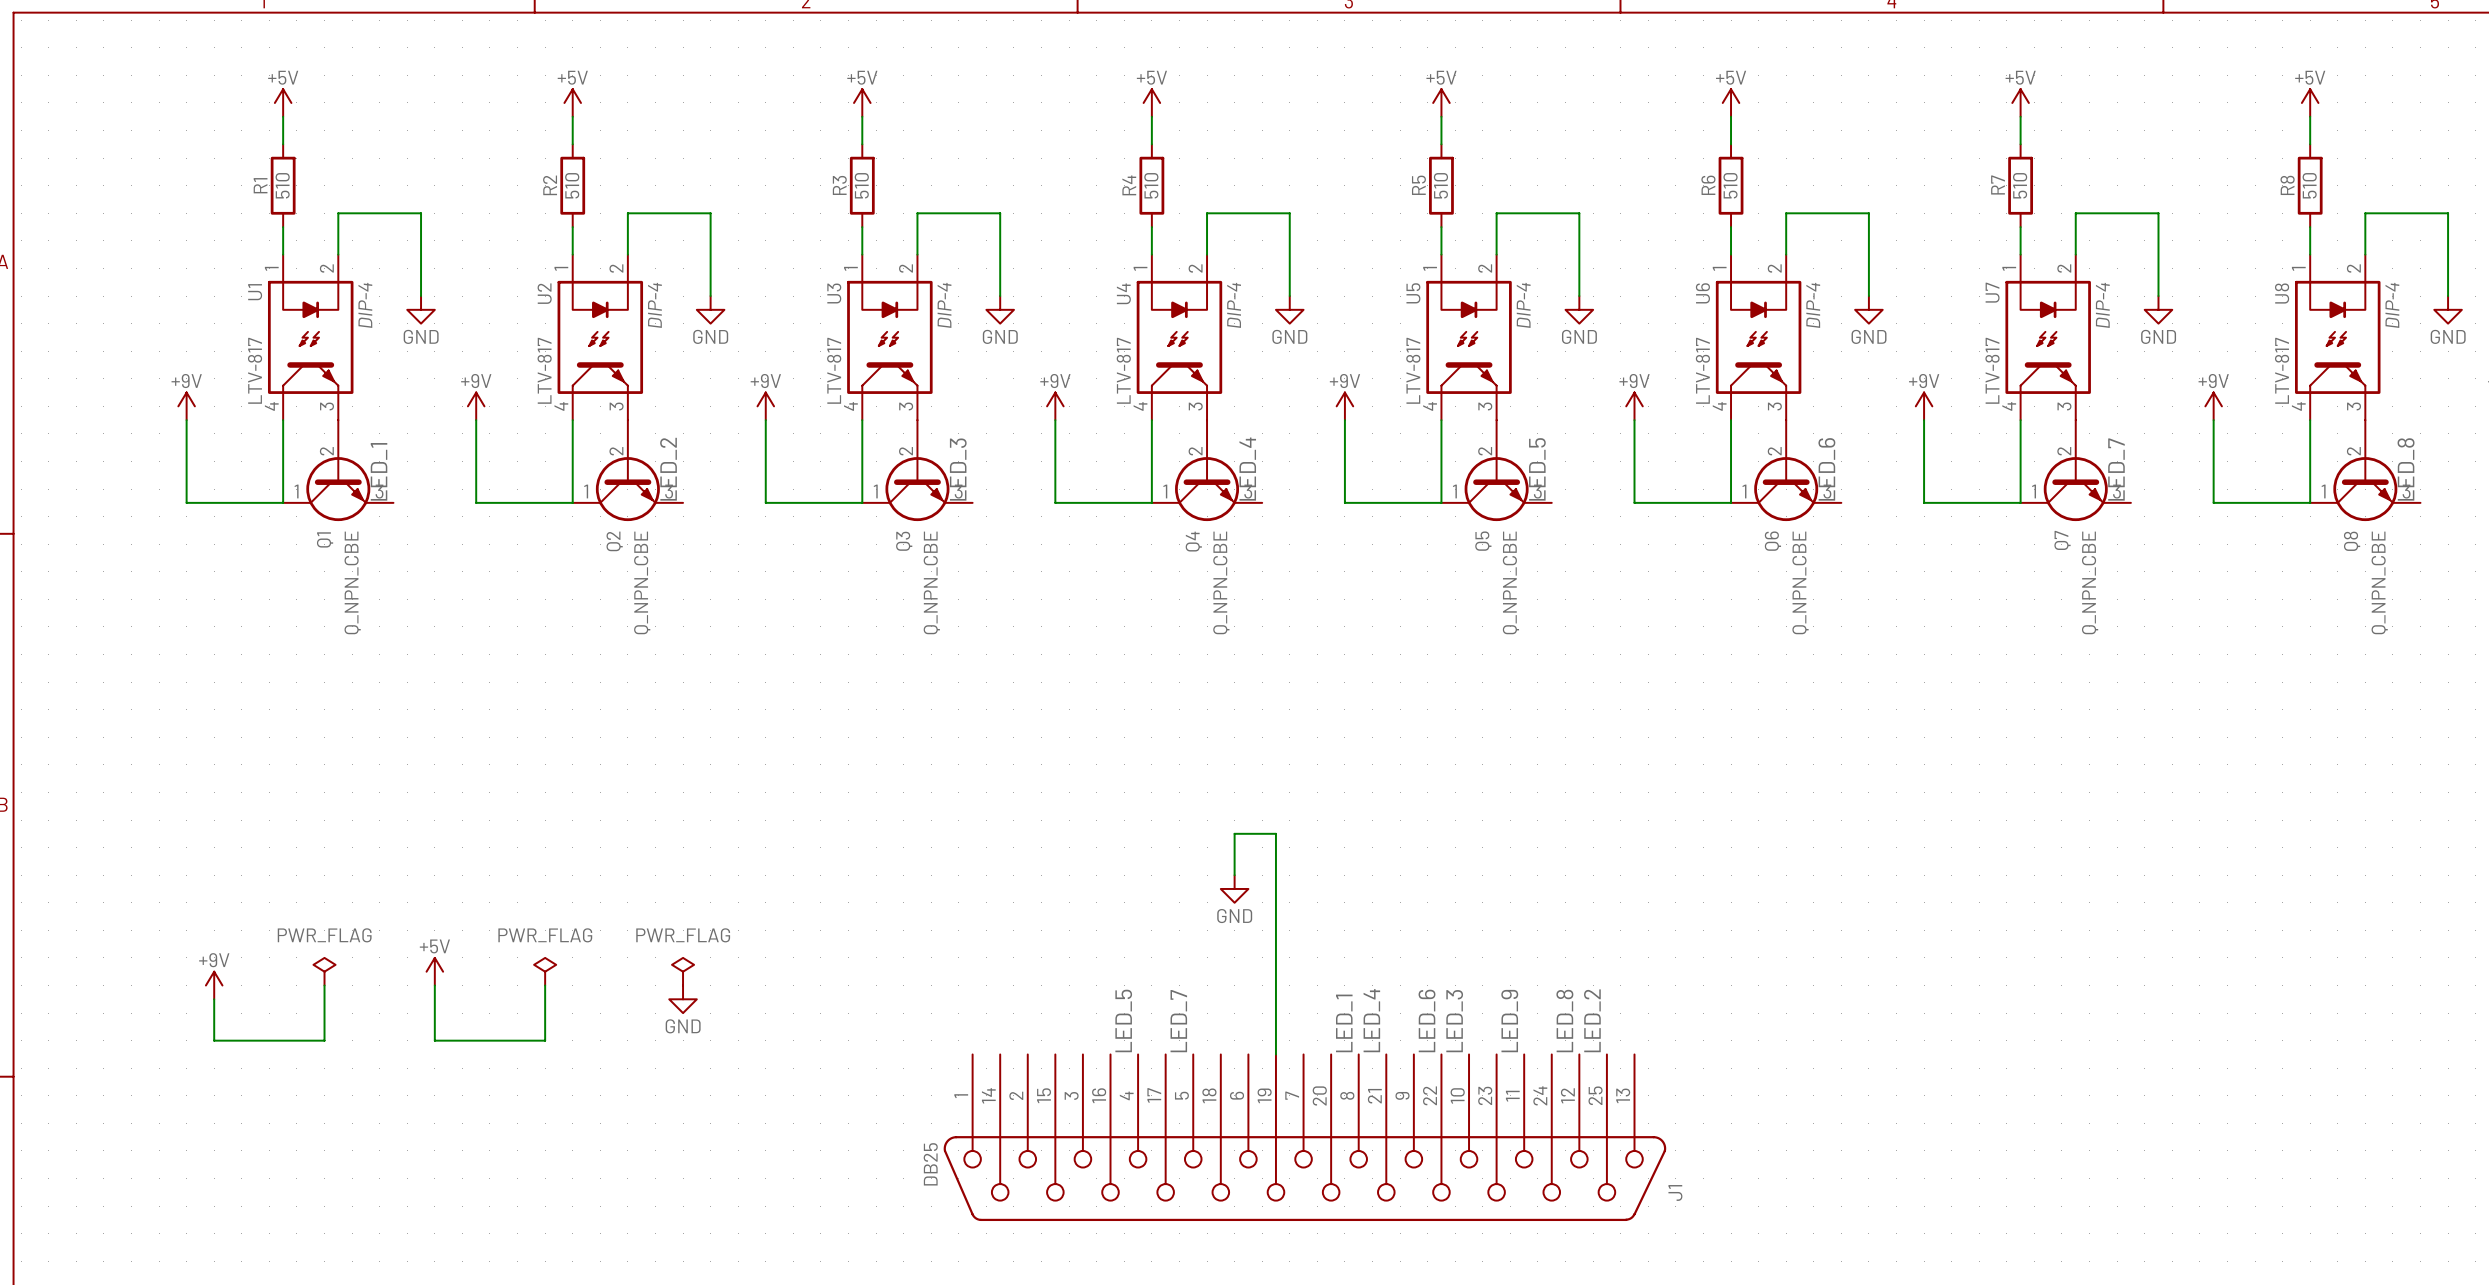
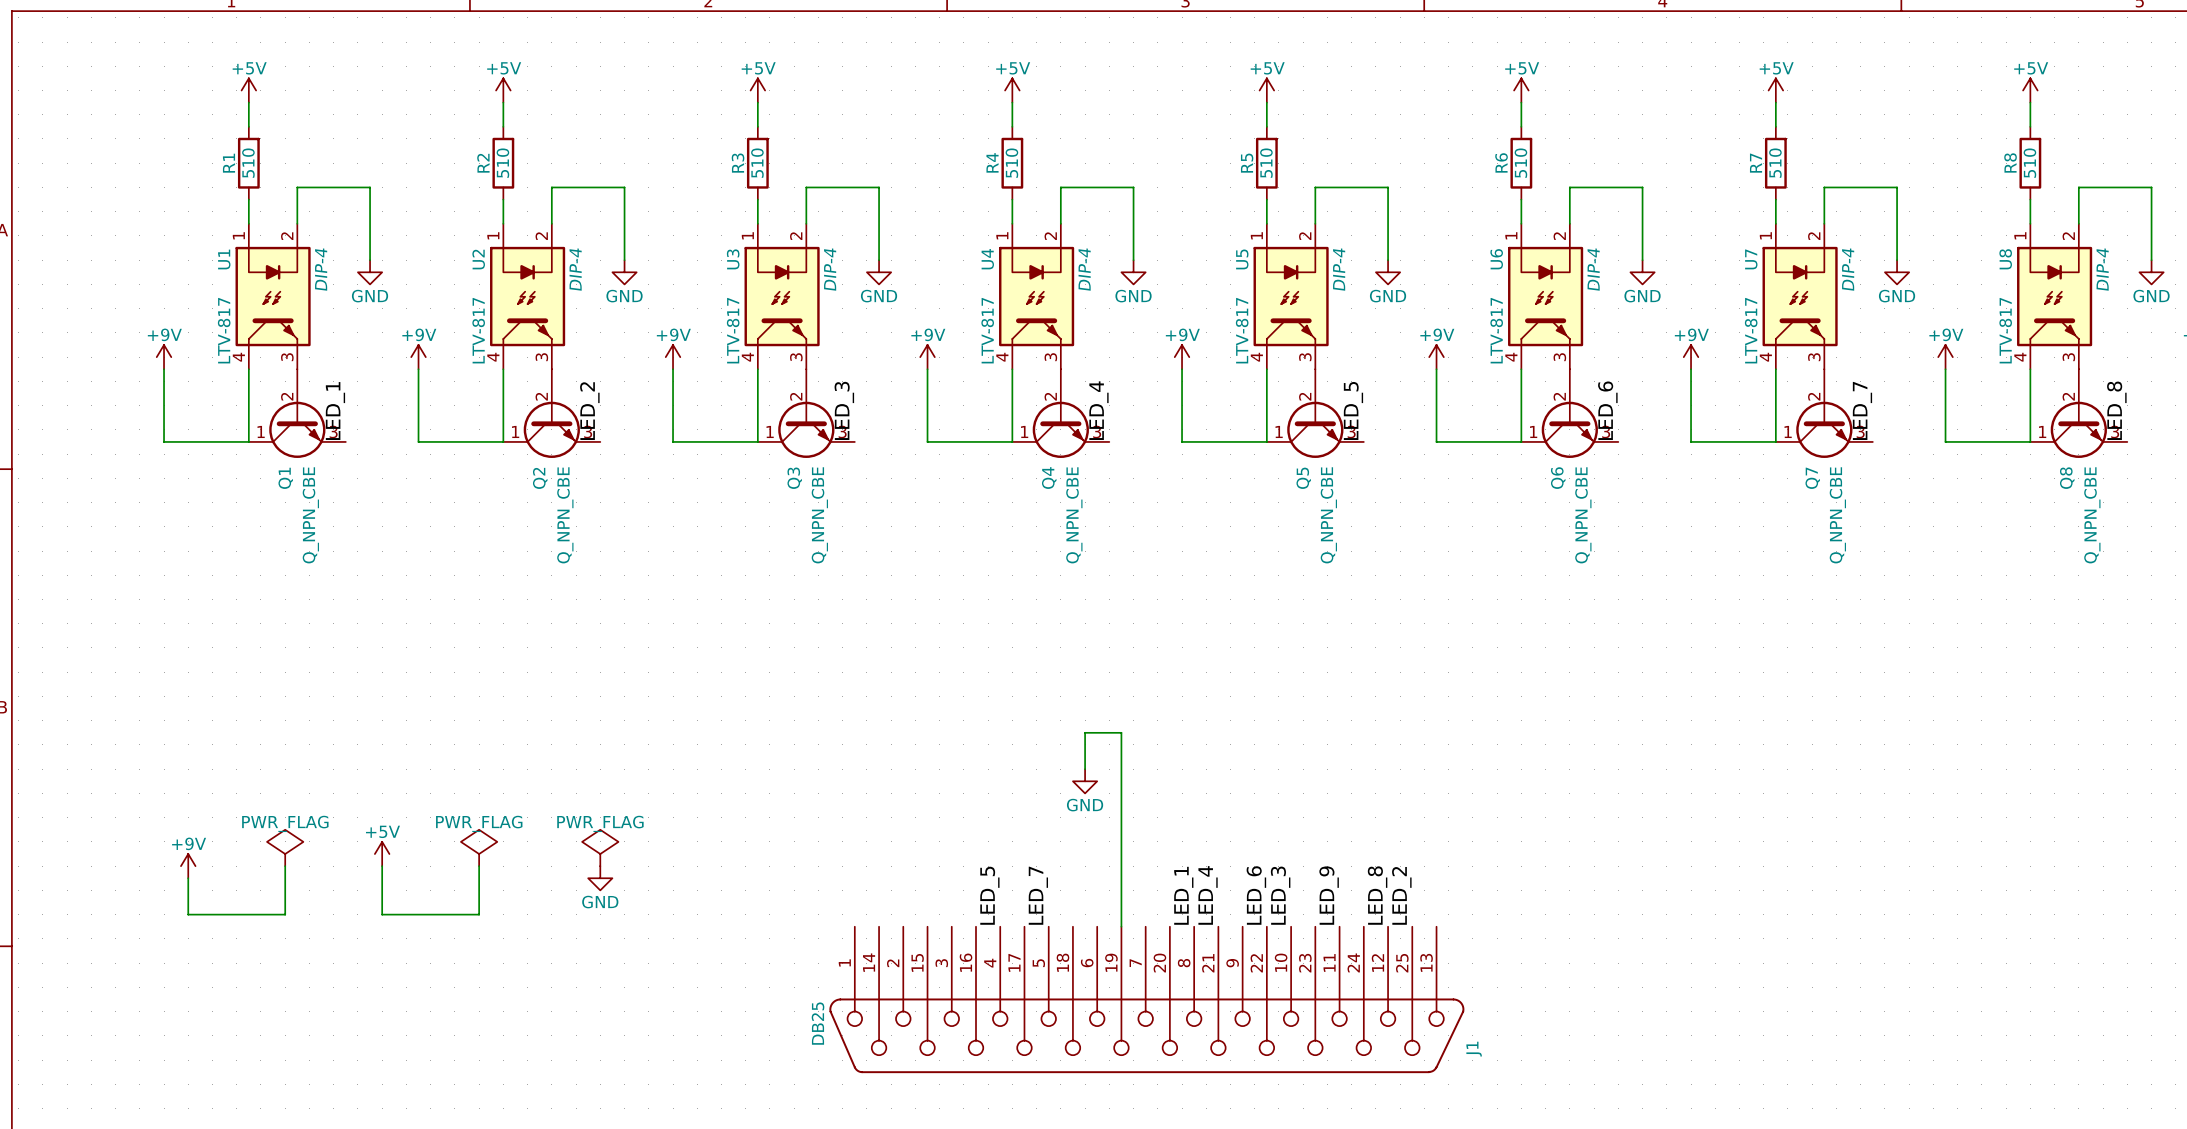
power symbol shape: [313, 957, 336, 986] -> [267, 829, 304, 867]
power symbol shape: [534, 957, 557, 986] -> [460, 829, 498, 867]
power symbol shape: [672, 957, 695, 986] -> [582, 829, 619, 867]

